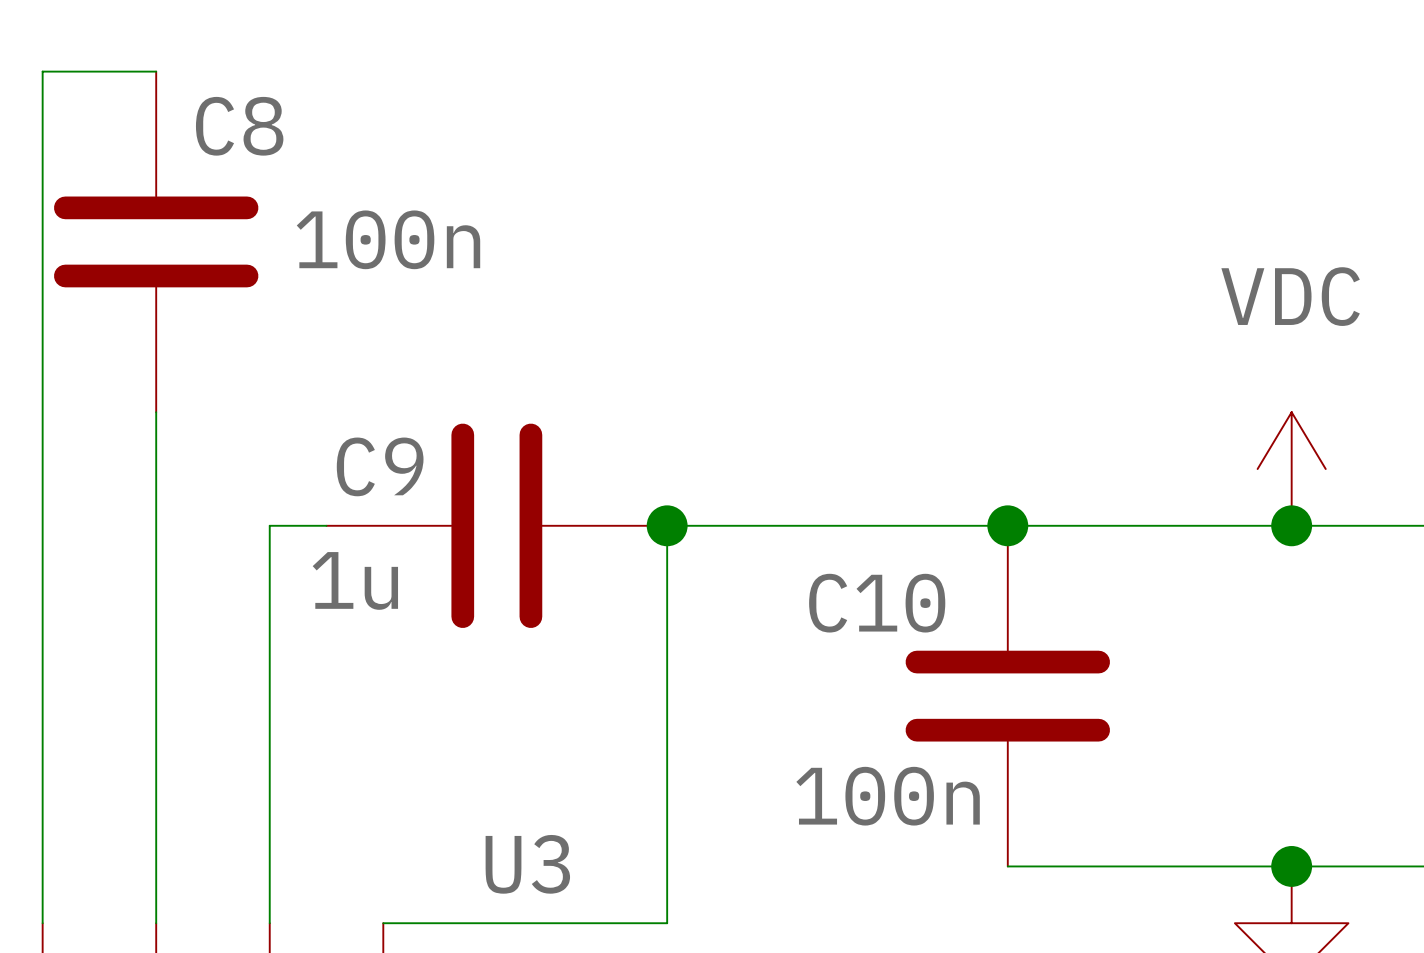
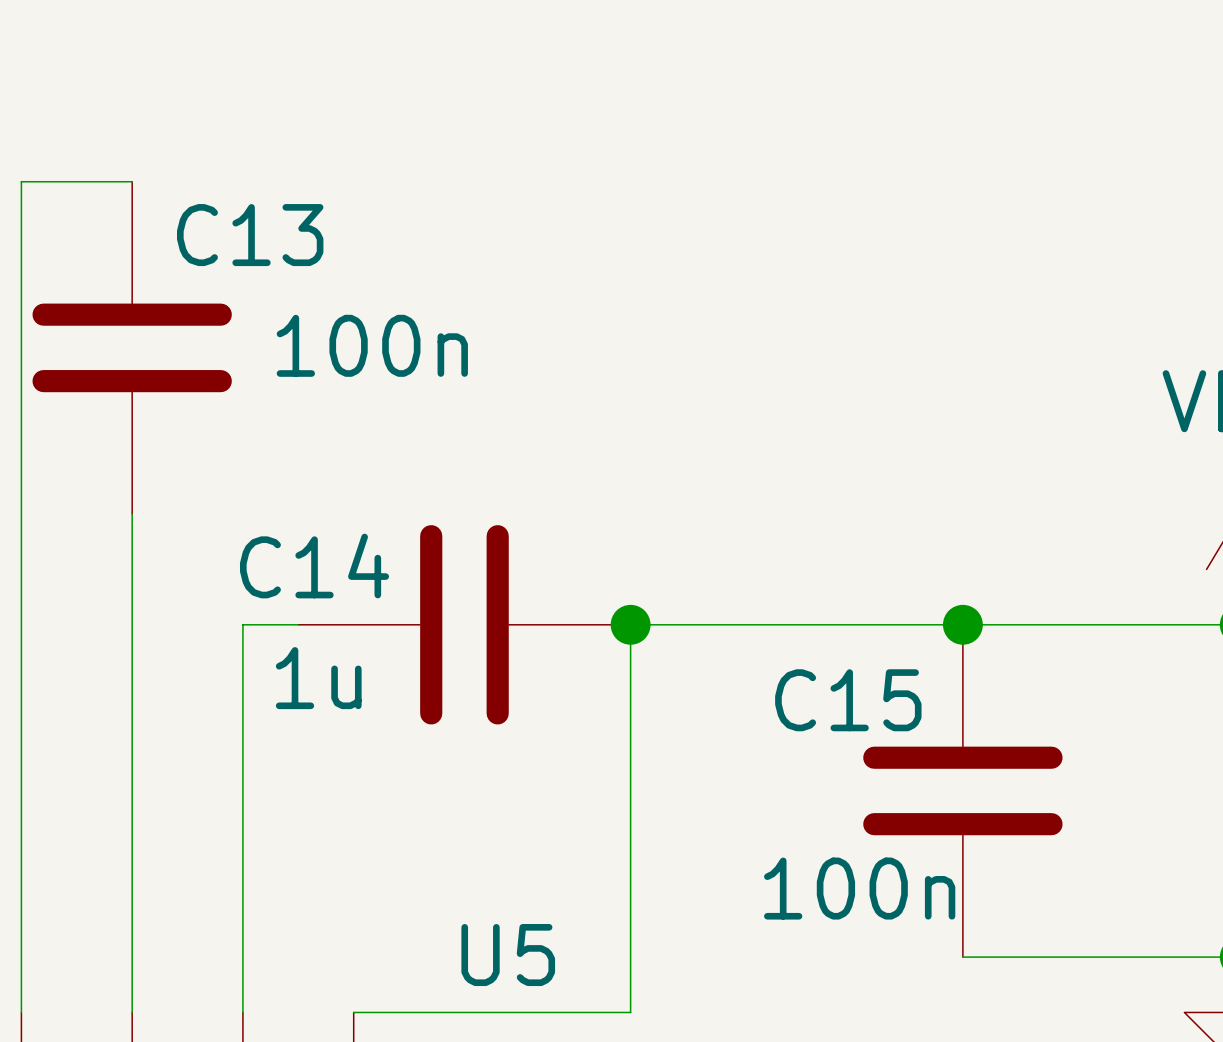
C8 name: C8 (239, 126) -> C13 (250, 235)
C9 name: C9 (380, 466) -> C14 (314, 566)
C10 name: C10 (877, 603) -> C15 (848, 700)
U3 name: U3 (527, 864) -> U5 (508, 955)

